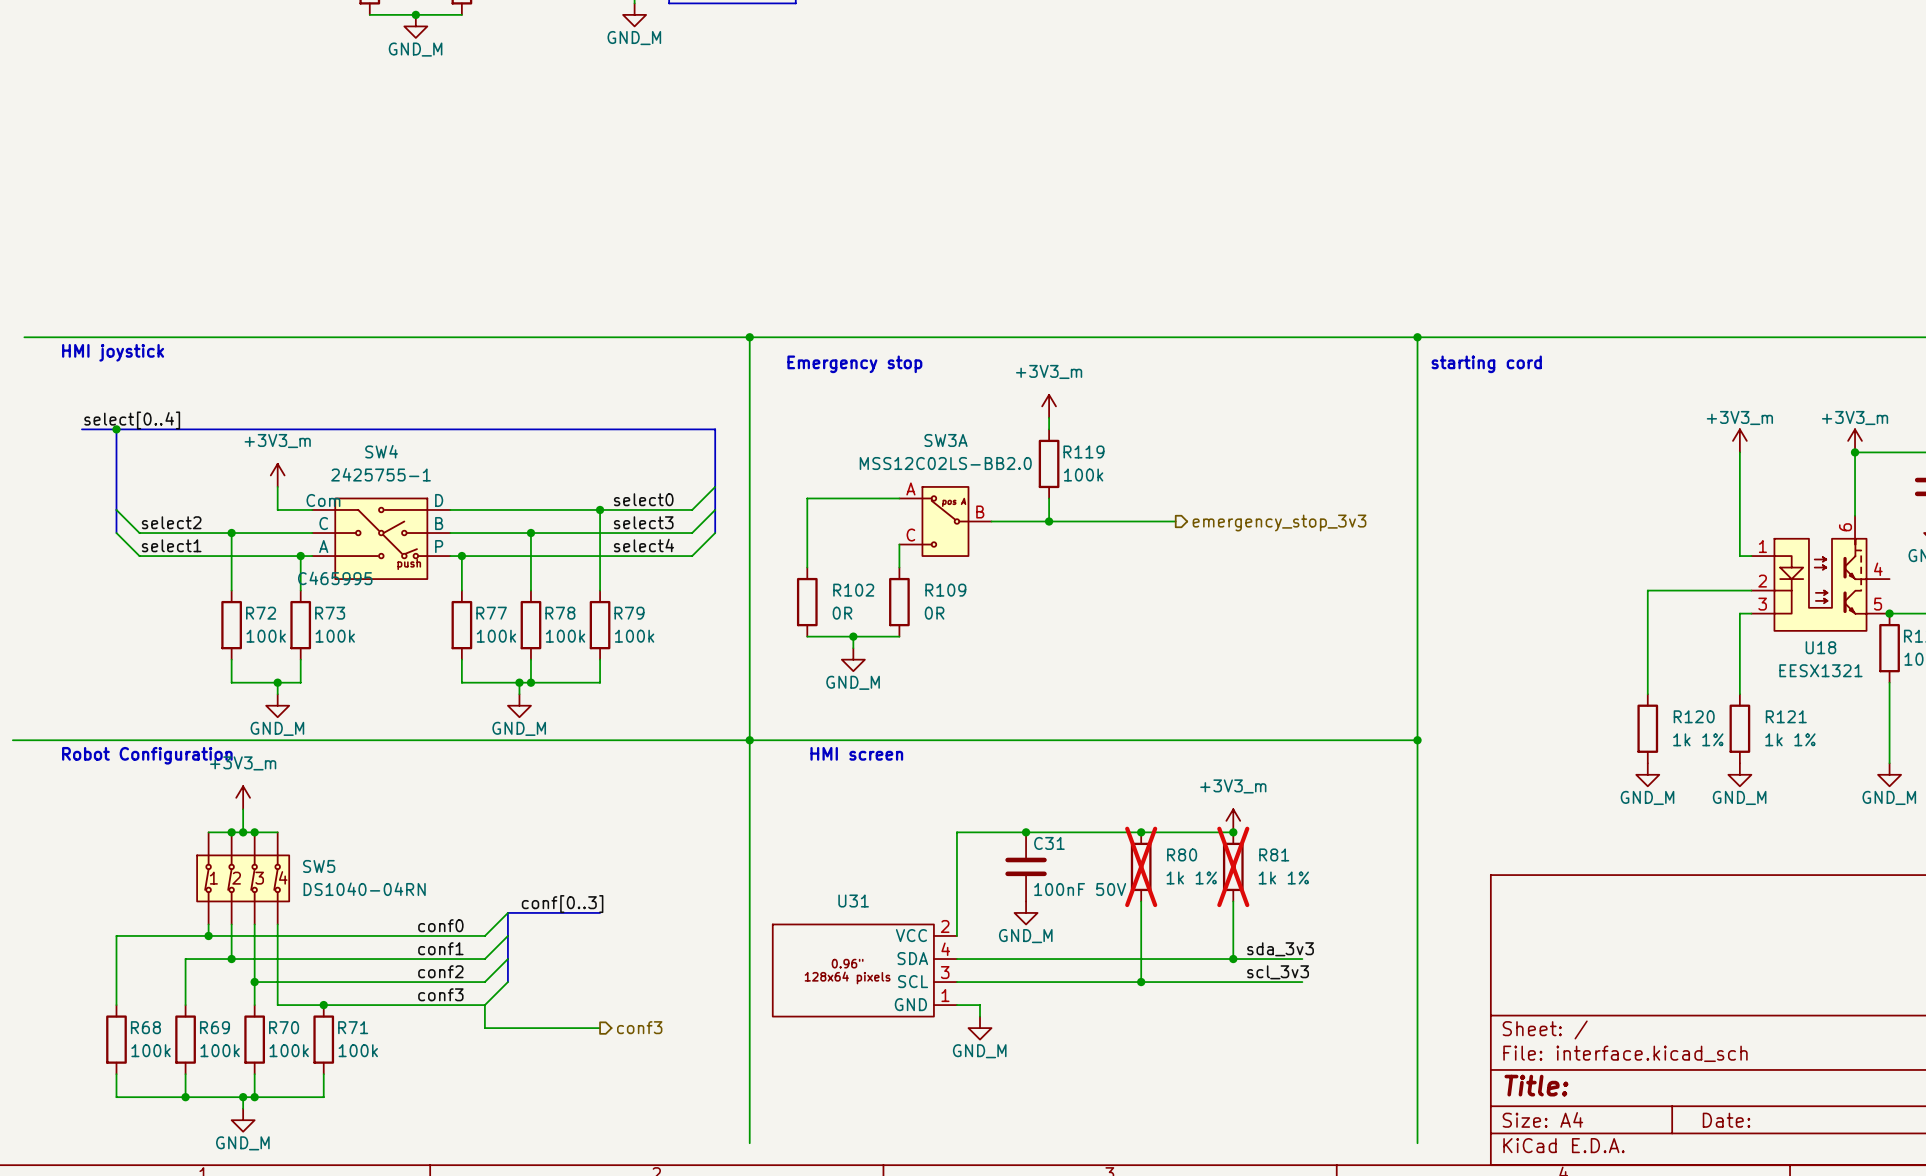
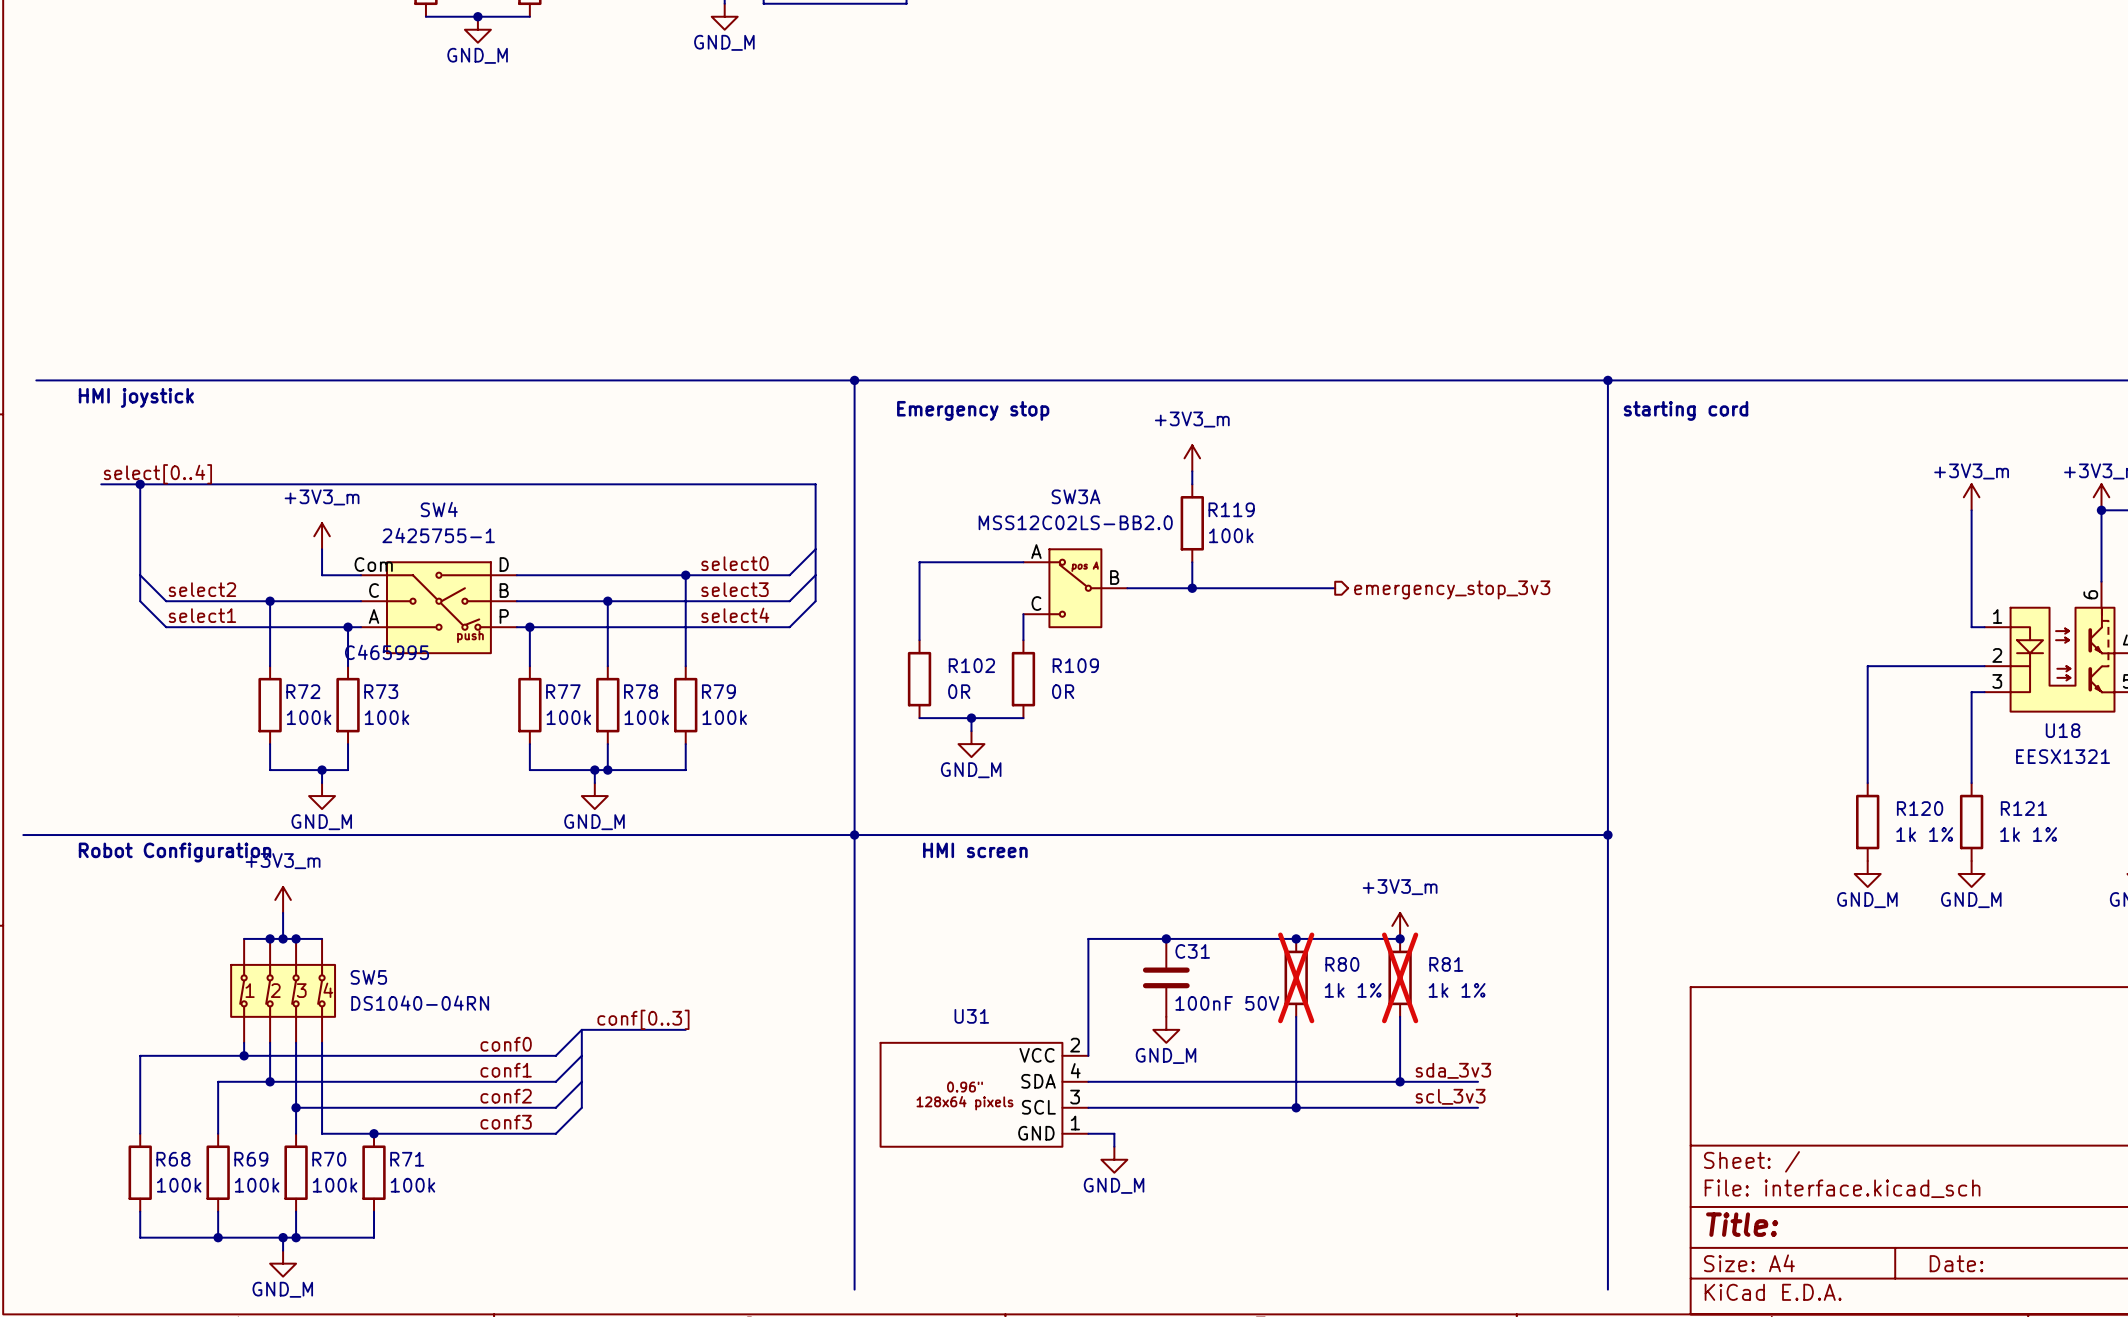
wire: (484, 1005) (484, 1028) (600, 1028) -> none
hierarchical label: conf3 (639, 1027) -> none

